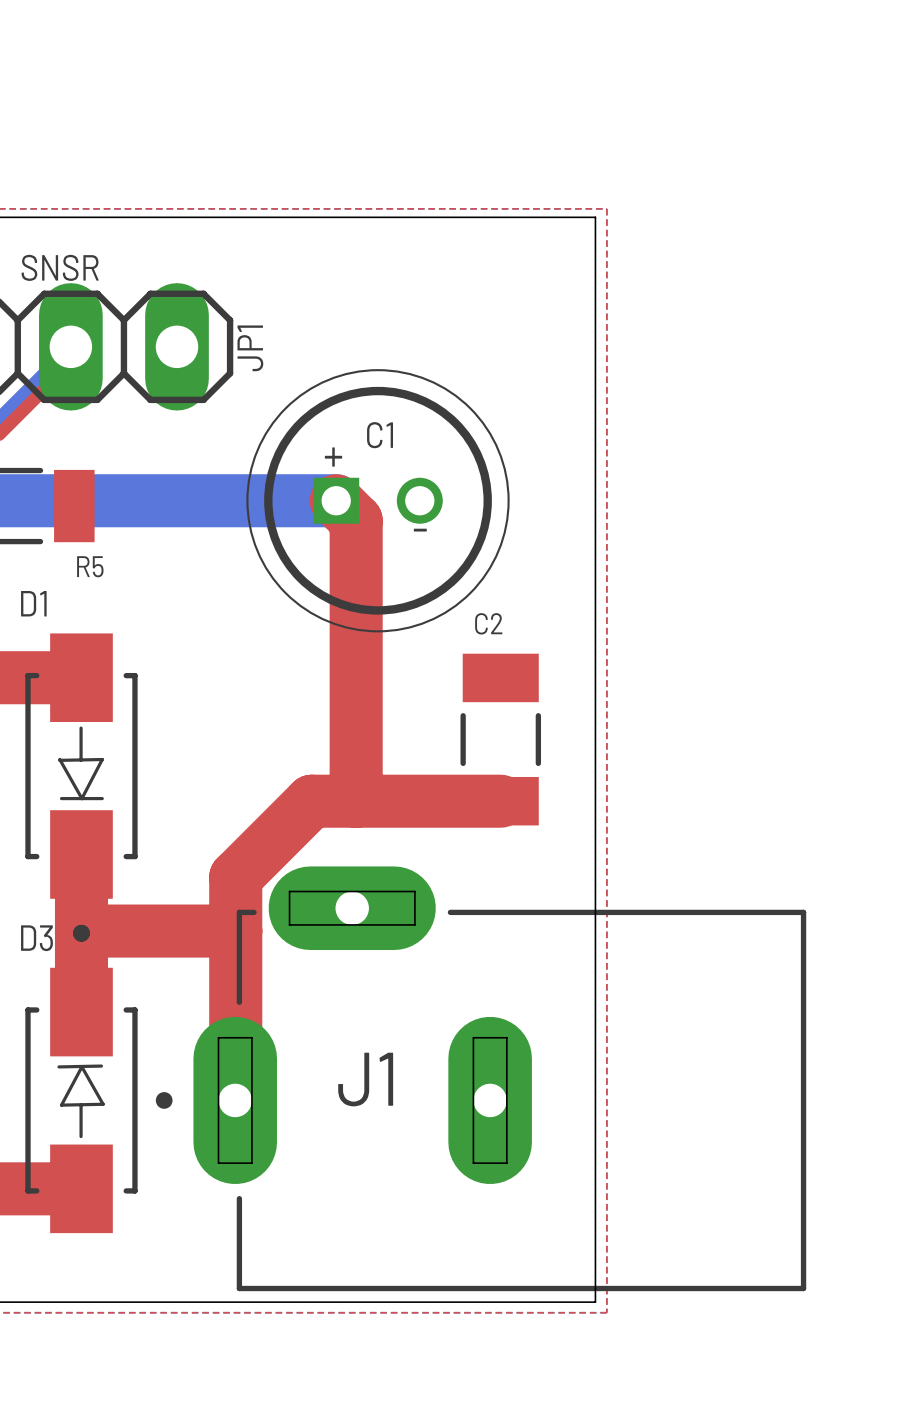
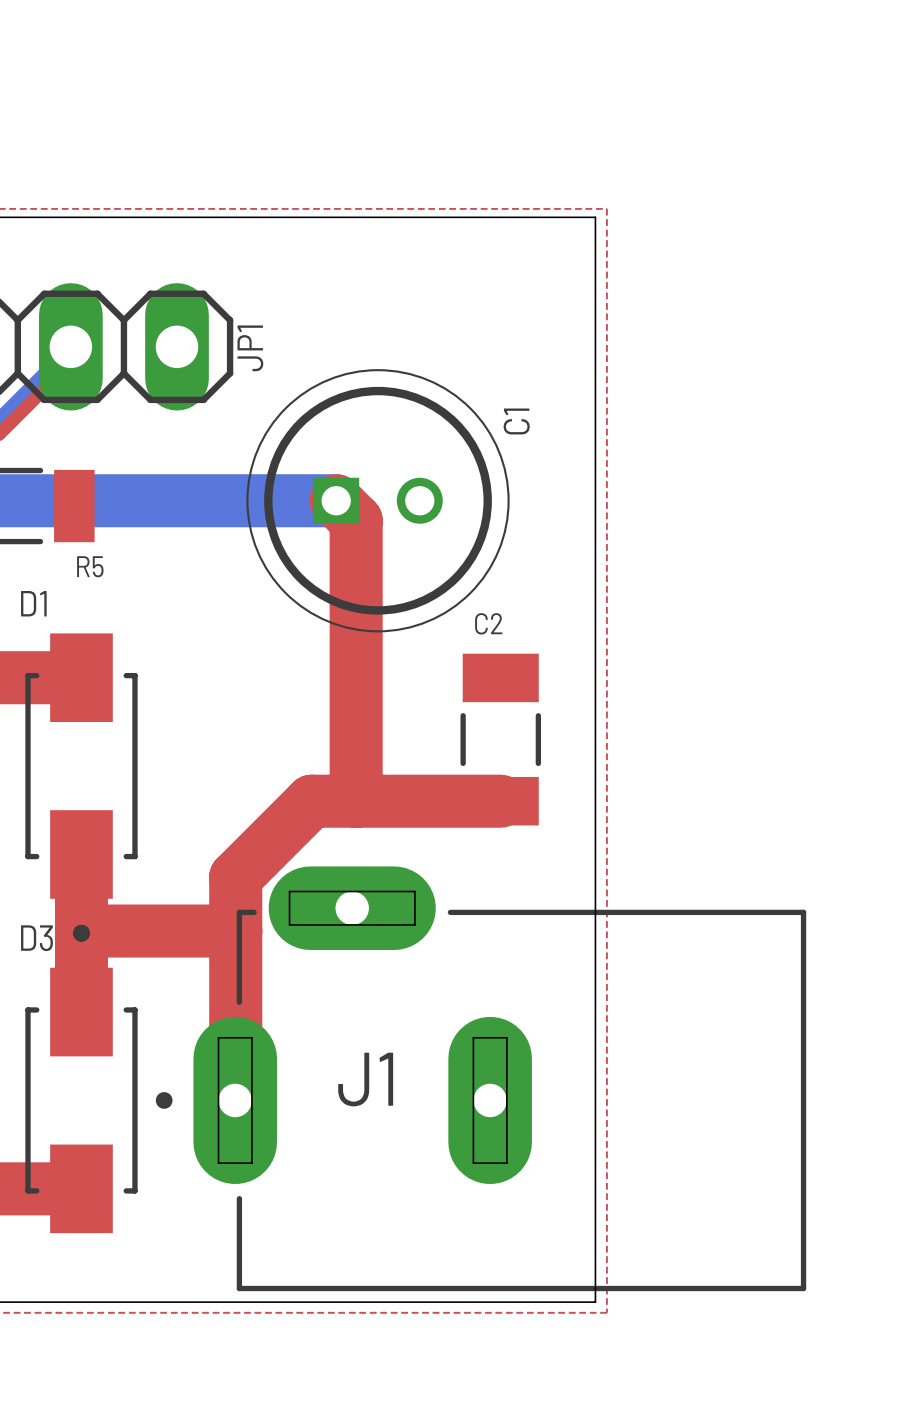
text: SNSR (60, 267) -> none
C1 name rotation: 0° (380, 435) -> 90° counterclockwise (516, 421)
C1 name position: C1 (380, 435) -> C1 (516, 421)
text: + (333, 457) -> none
text: - (420, 530) -> none
line: (81, 728) (81, 760) -> none
line: (59, 759) (81, 798) (102, 759) (59, 760) -> none
line: (61, 798) (102, 798) -> none
line: (81, 1066) (103, 1104) (61, 1105) (81, 1066) -> none
line: (101, 1066) (58, 1066) -> none
line: (81, 1105) (81, 1136) -> none

